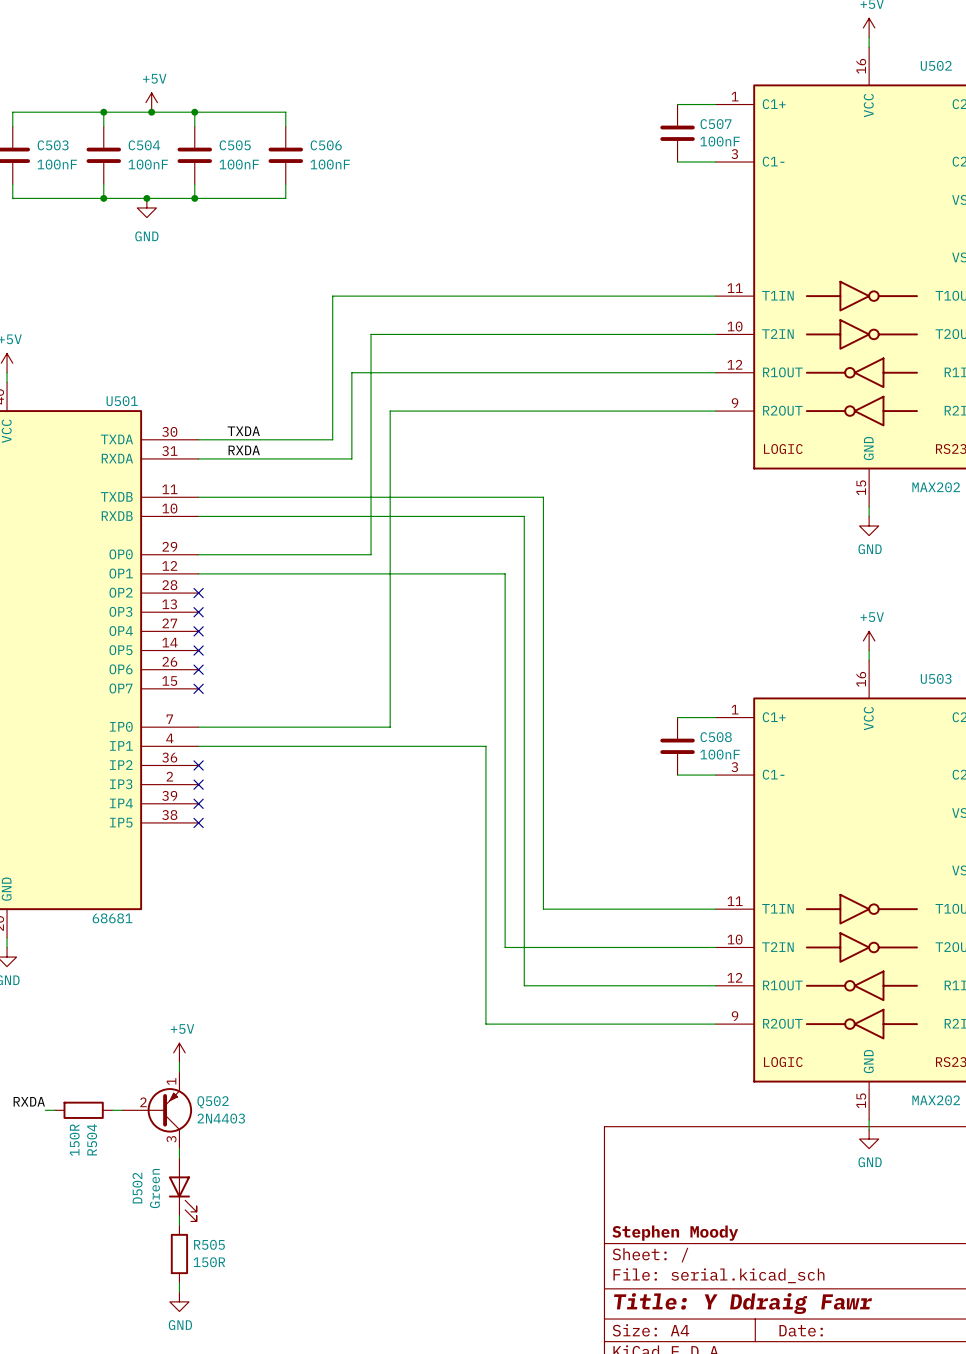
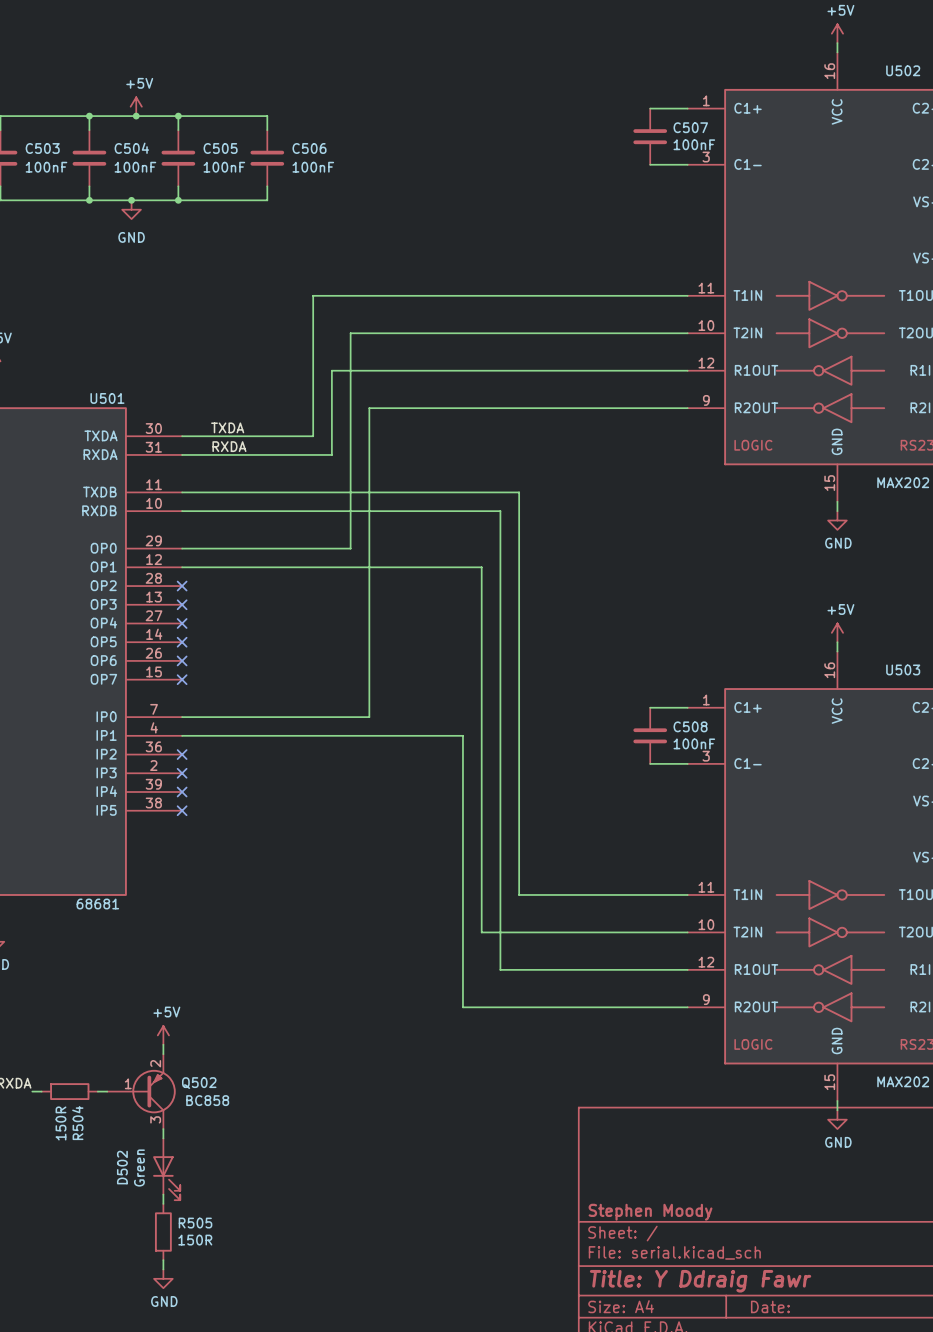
Q502 pin number: 1 (171, 1081) -> 2 (155, 1063)
Q502 pin number: 2 (143, 1102) -> 1 (128, 1083)
Q502 value: 2N4403 (221, 1118) -> BC858 (207, 1100)

